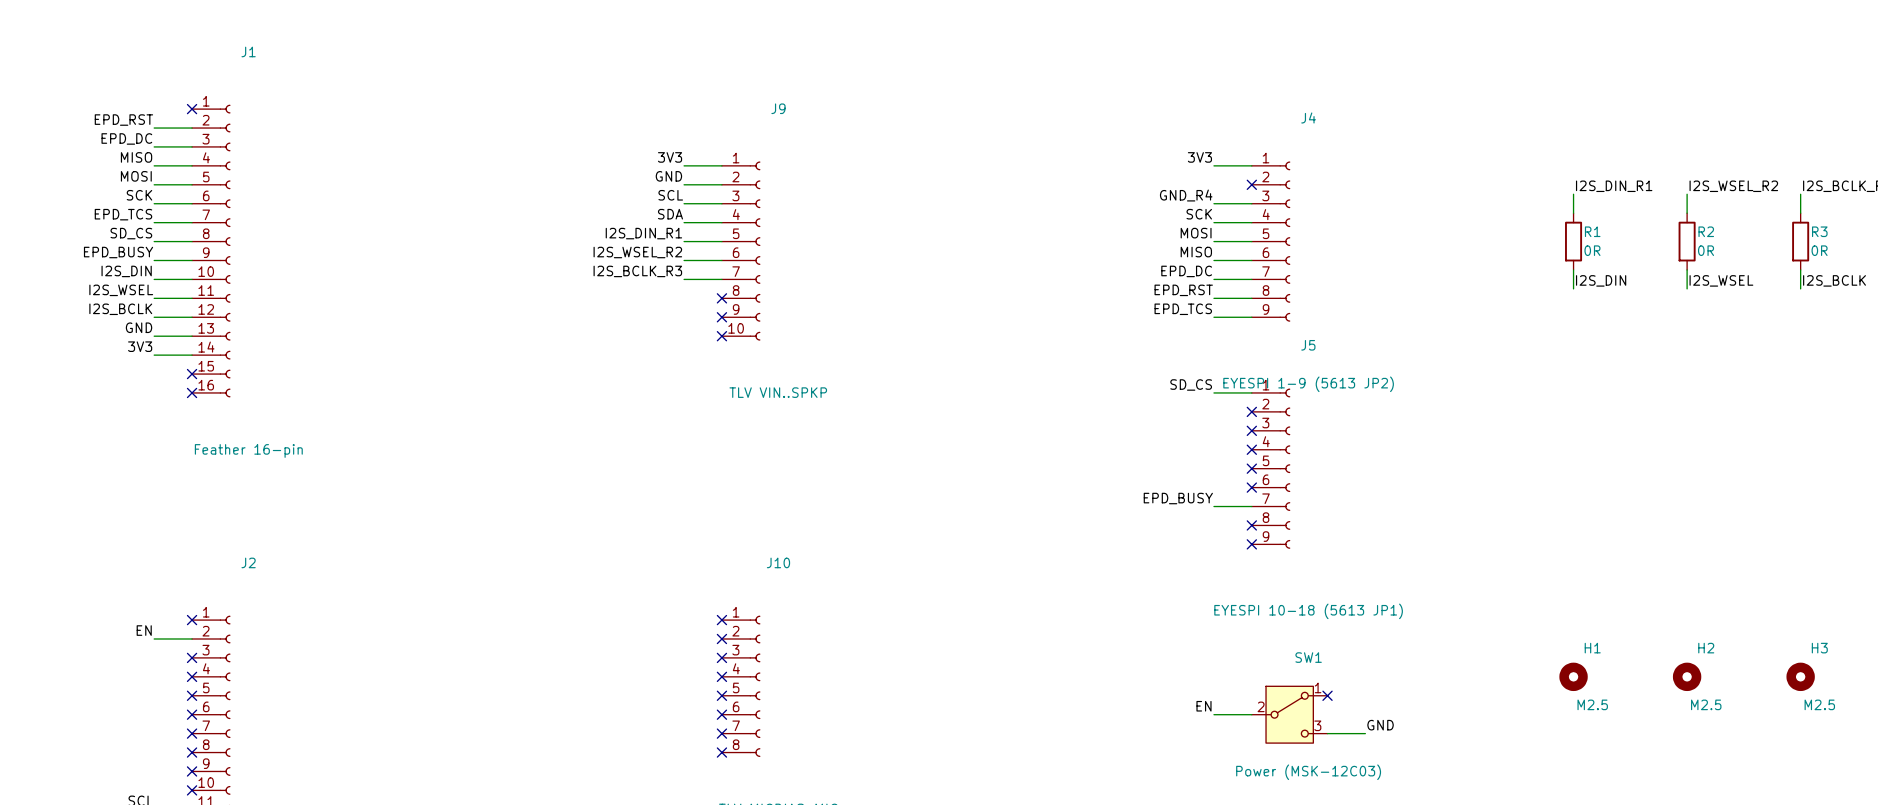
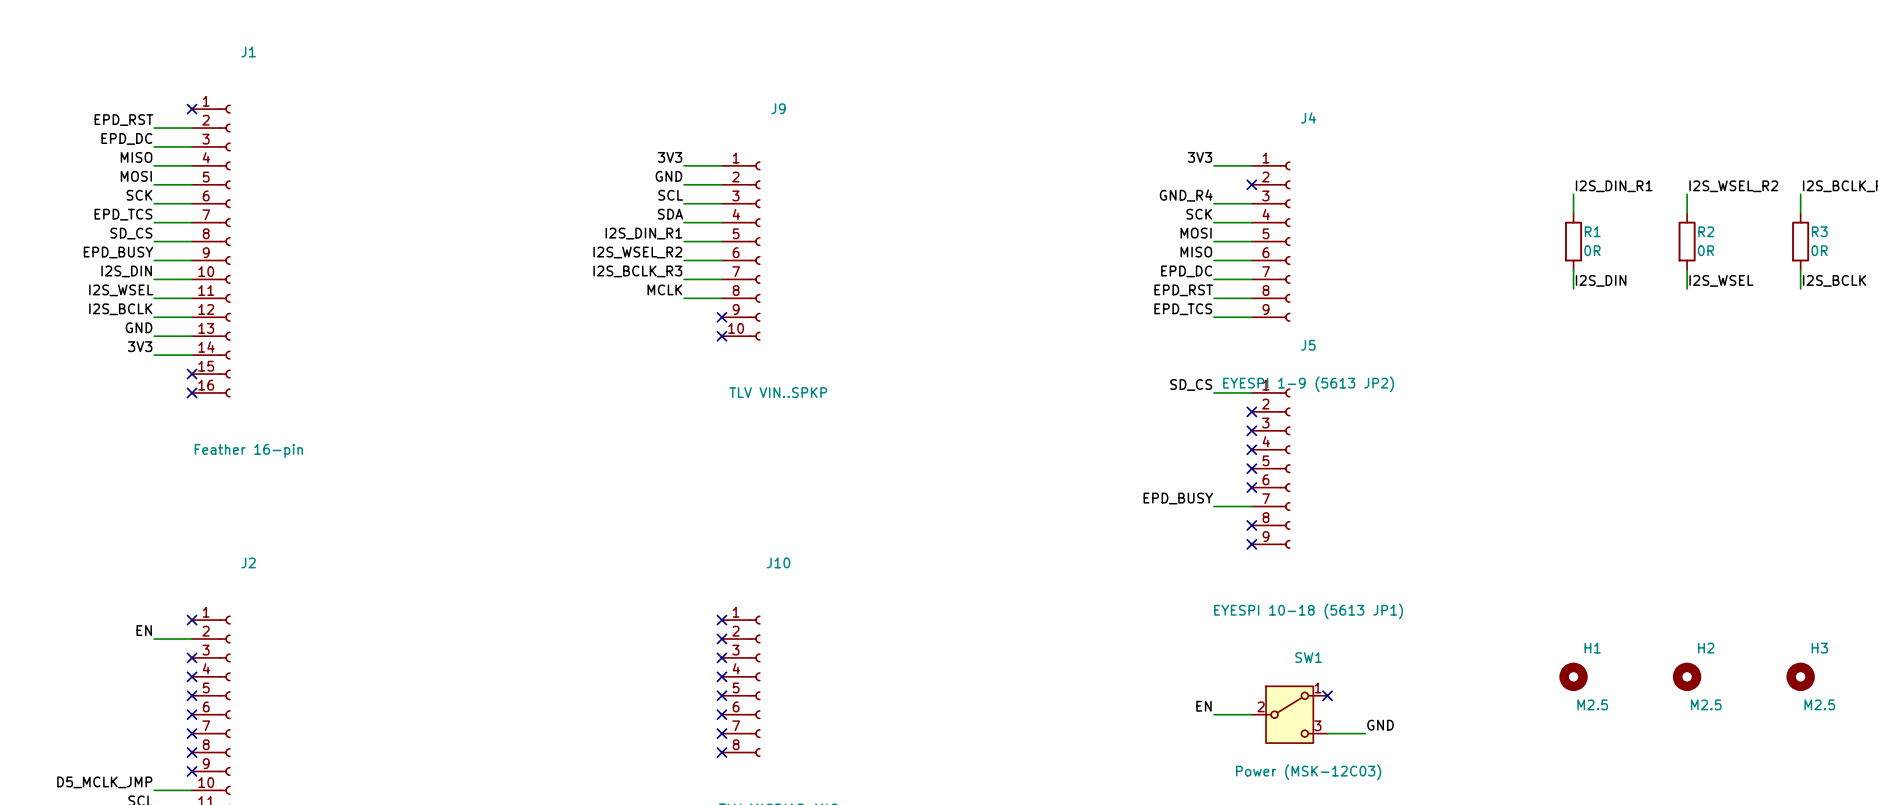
label: none -> MCLK (664, 289)
wire: none -> (684, 298) (721, 298)
no-connect mark: (721, 298) -> none
label: none -> D5_MCLK_JMP (104, 782)
wire: none -> (154, 790) (192, 790)
no-connect mark: (192, 790) -> none

